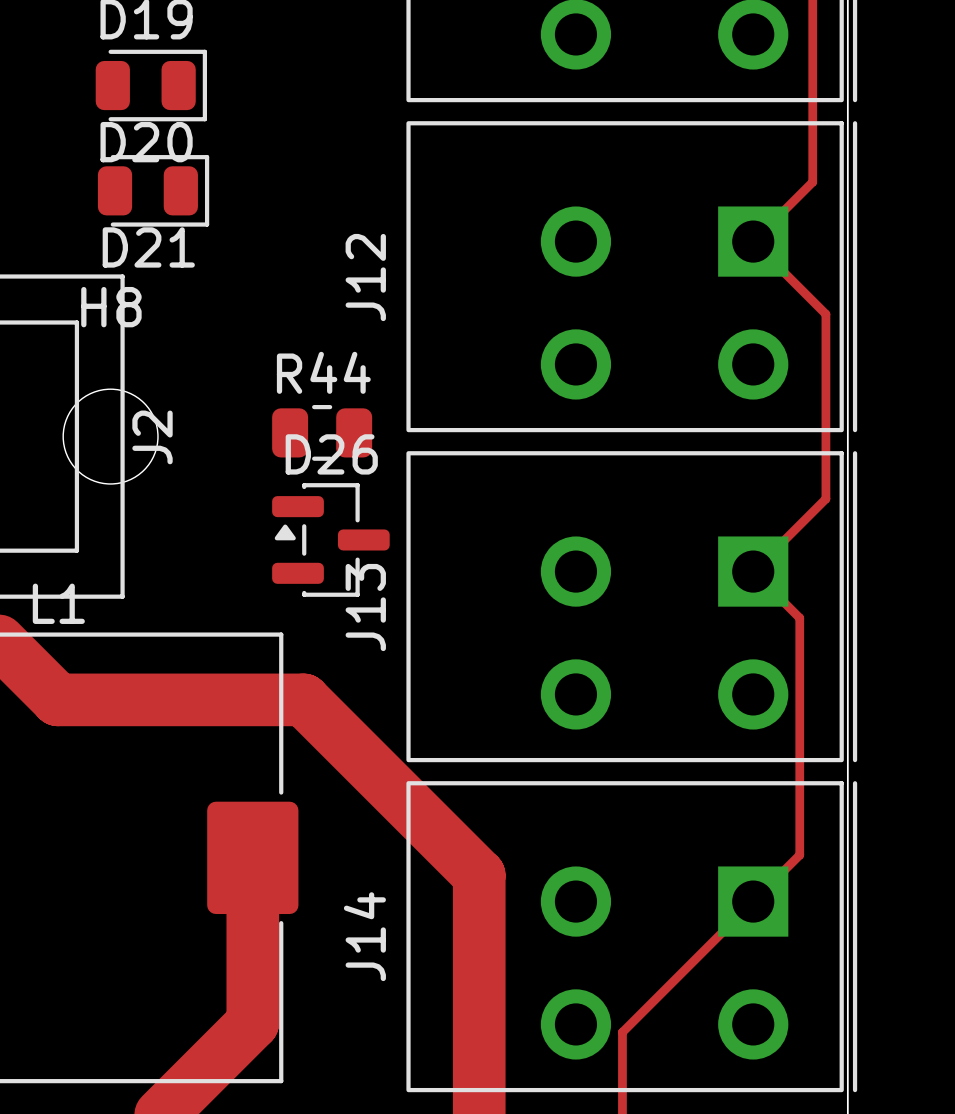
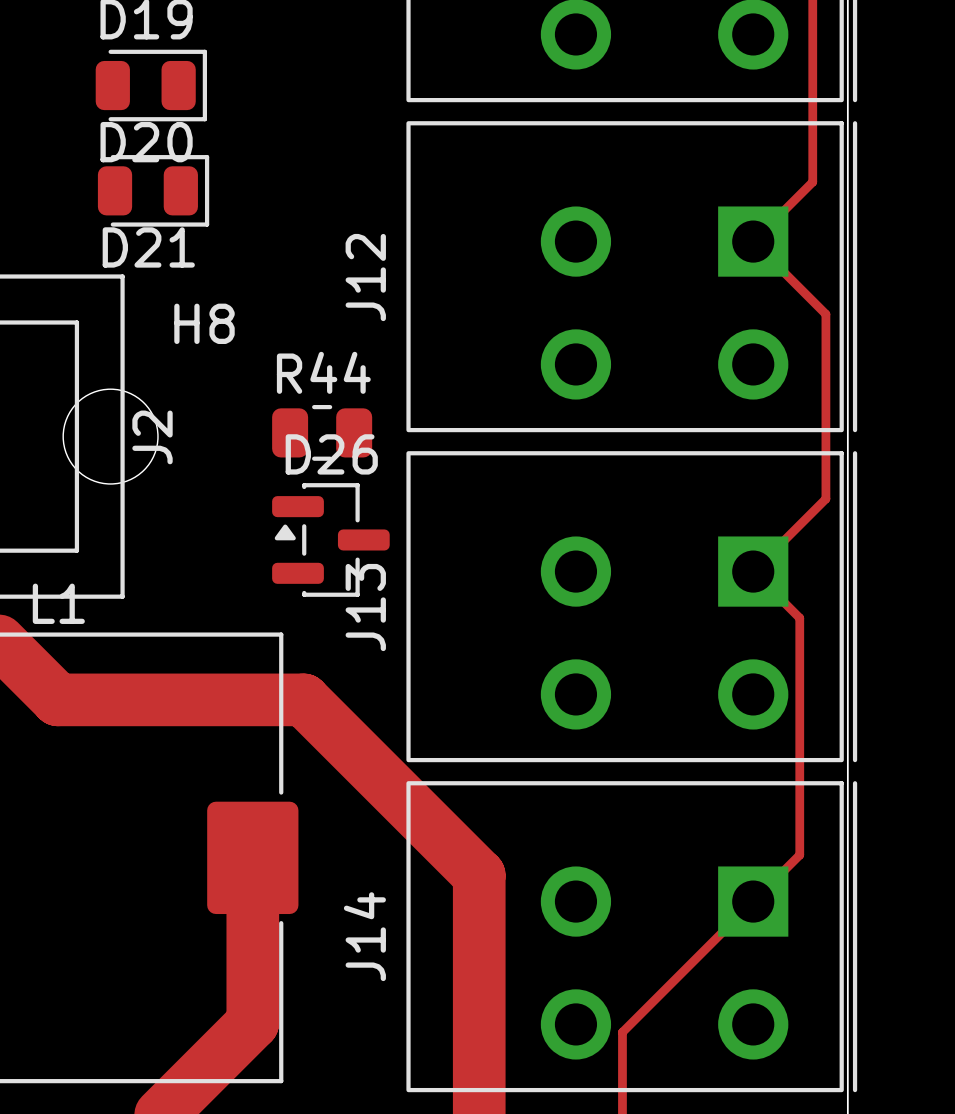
H8 name position: H8 (111, 307) -> H8 (204, 323)

